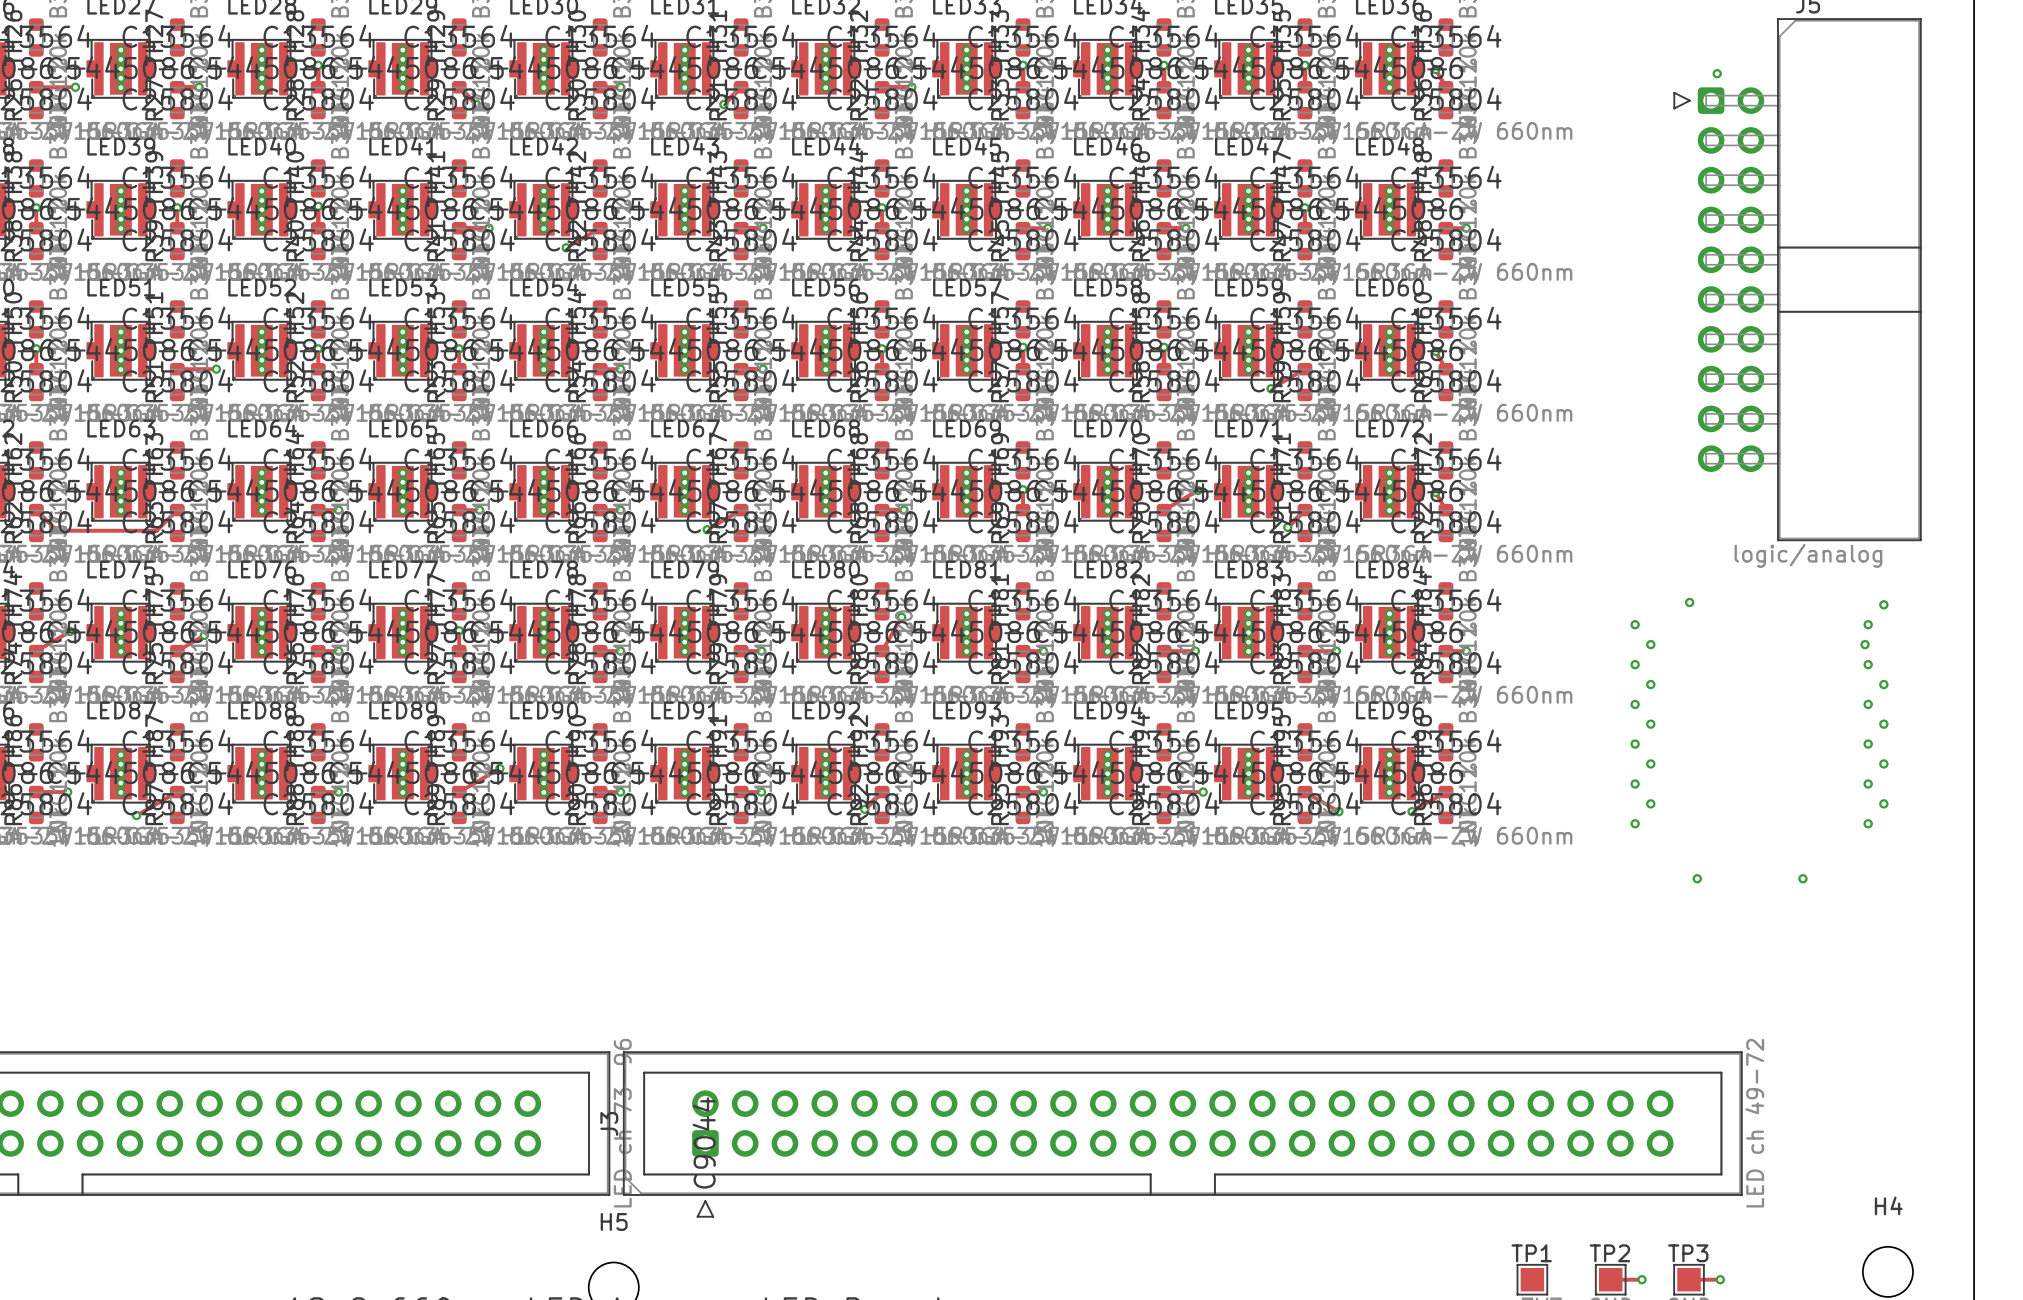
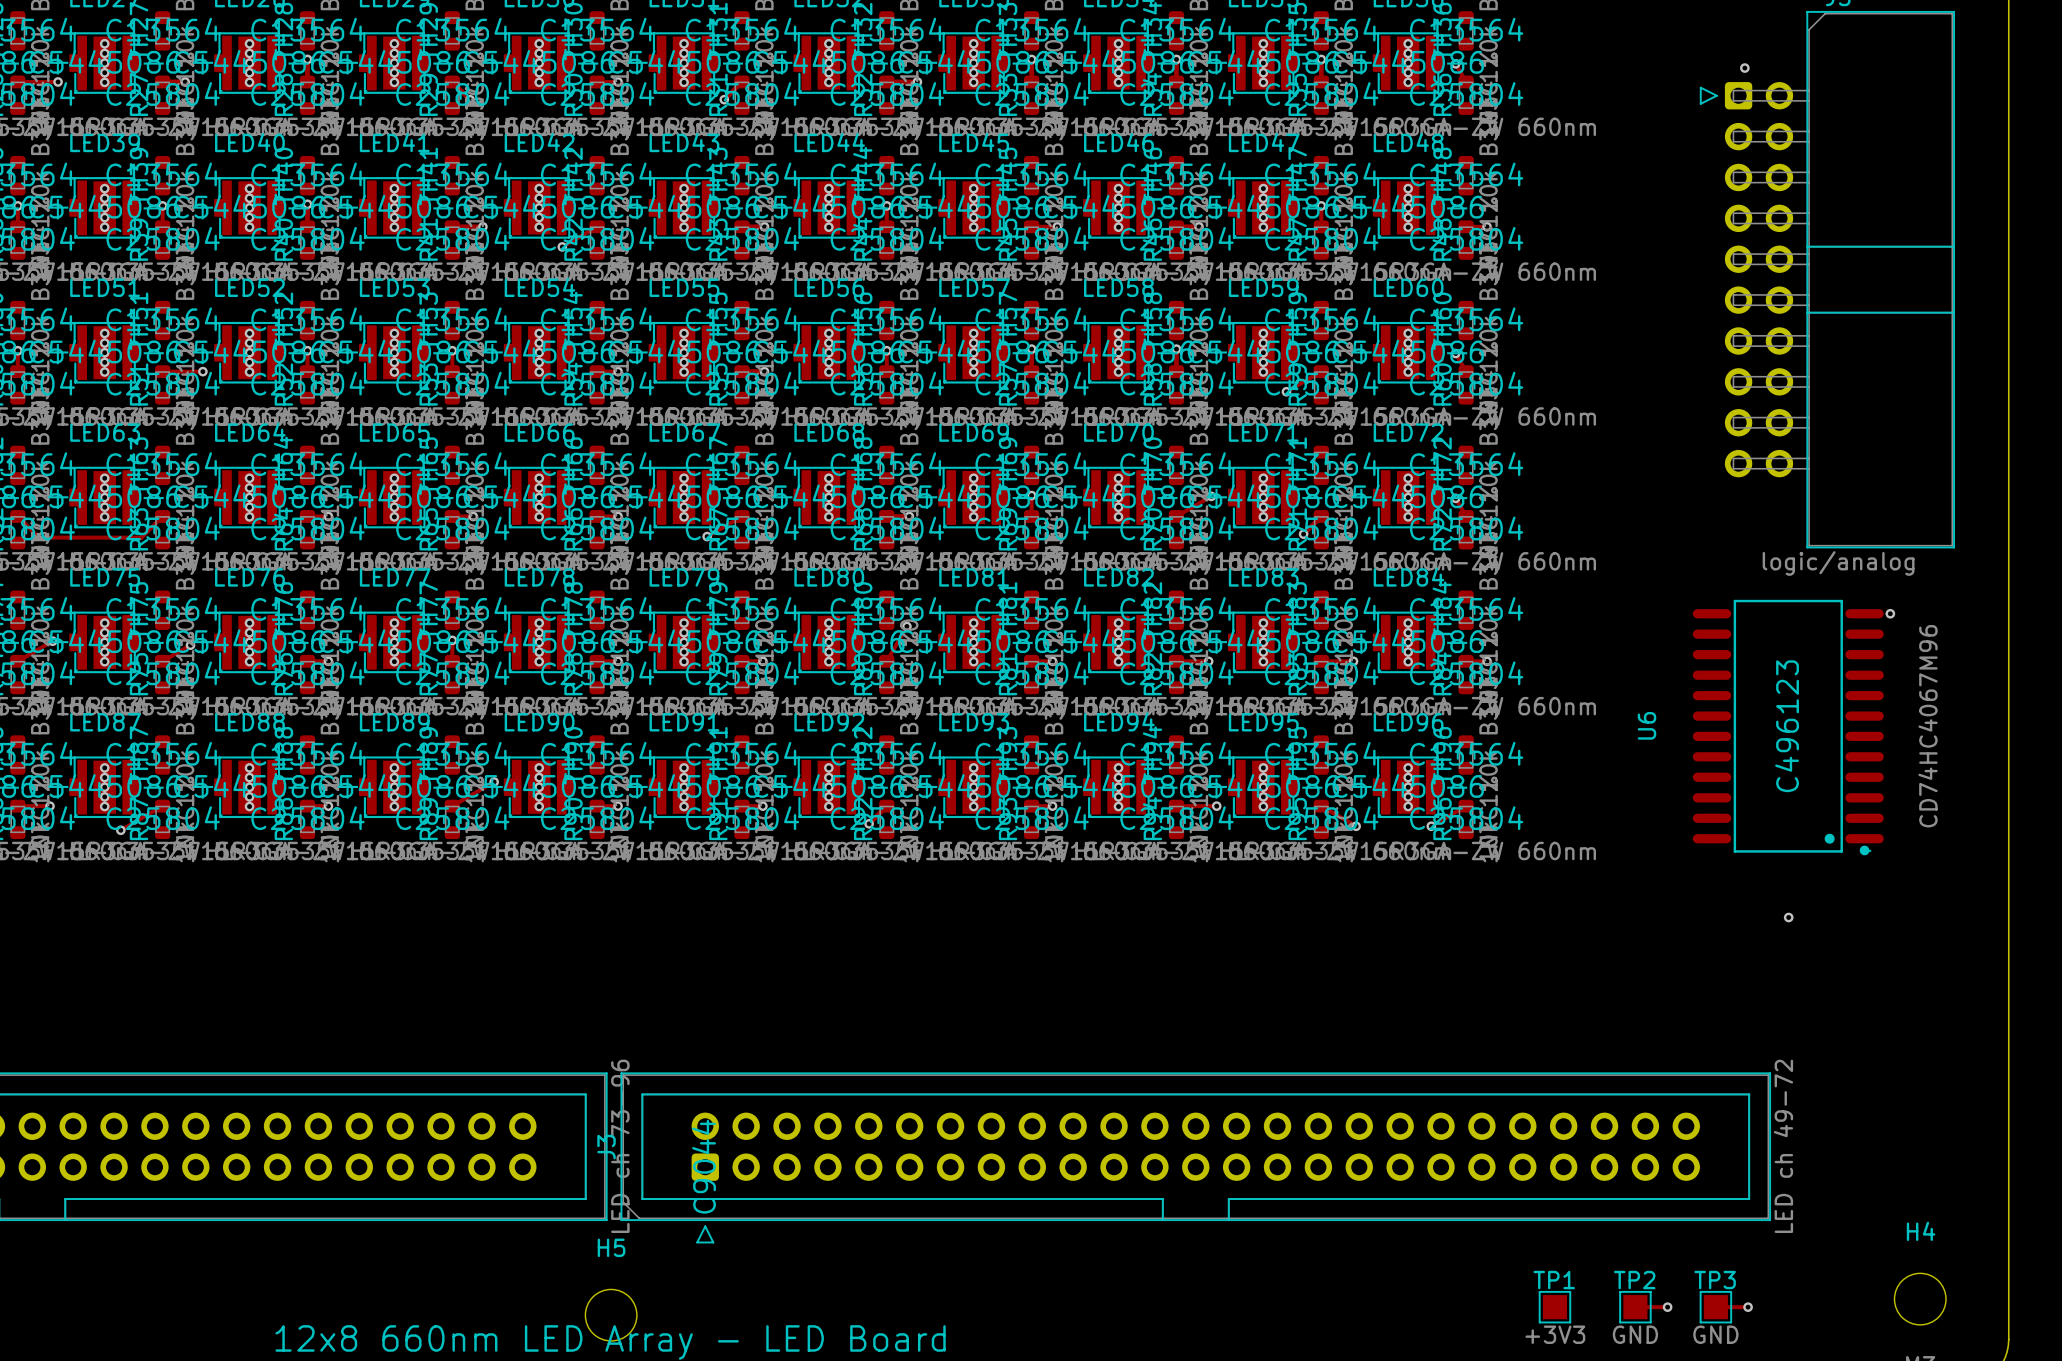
via: (1689, 602) -> none
via: none -> (1890, 613)
via: (1883, 604) -> none
via: (1635, 624) -> none
via: (1868, 624) -> none
via: (1650, 644) -> none
via: (1865, 644) -> none
via: (1635, 664) -> none
via: (1868, 664) -> none
via: (1650, 684) -> none
via: (1883, 684) -> none
via: (1635, 704) -> none
via: (1868, 704) -> none
U6: none -> CD74HC4067M96 (1788, 727)
via: (1650, 724) -> none
via: (1883, 724) -> none
via: (1635, 744) -> none
via: (1868, 744) -> none
via: (1650, 763) -> none
via: (1883, 763) -> none
via: (1635, 783) -> none
via: (1868, 783) -> none
via: (1650, 803) -> none
via: (1883, 803) -> none
via: (1635, 823) -> none
via: (1868, 823) -> none
via: (1697, 878) -> none
via: (1802, 878) -> none
via: none -> (1788, 917)

